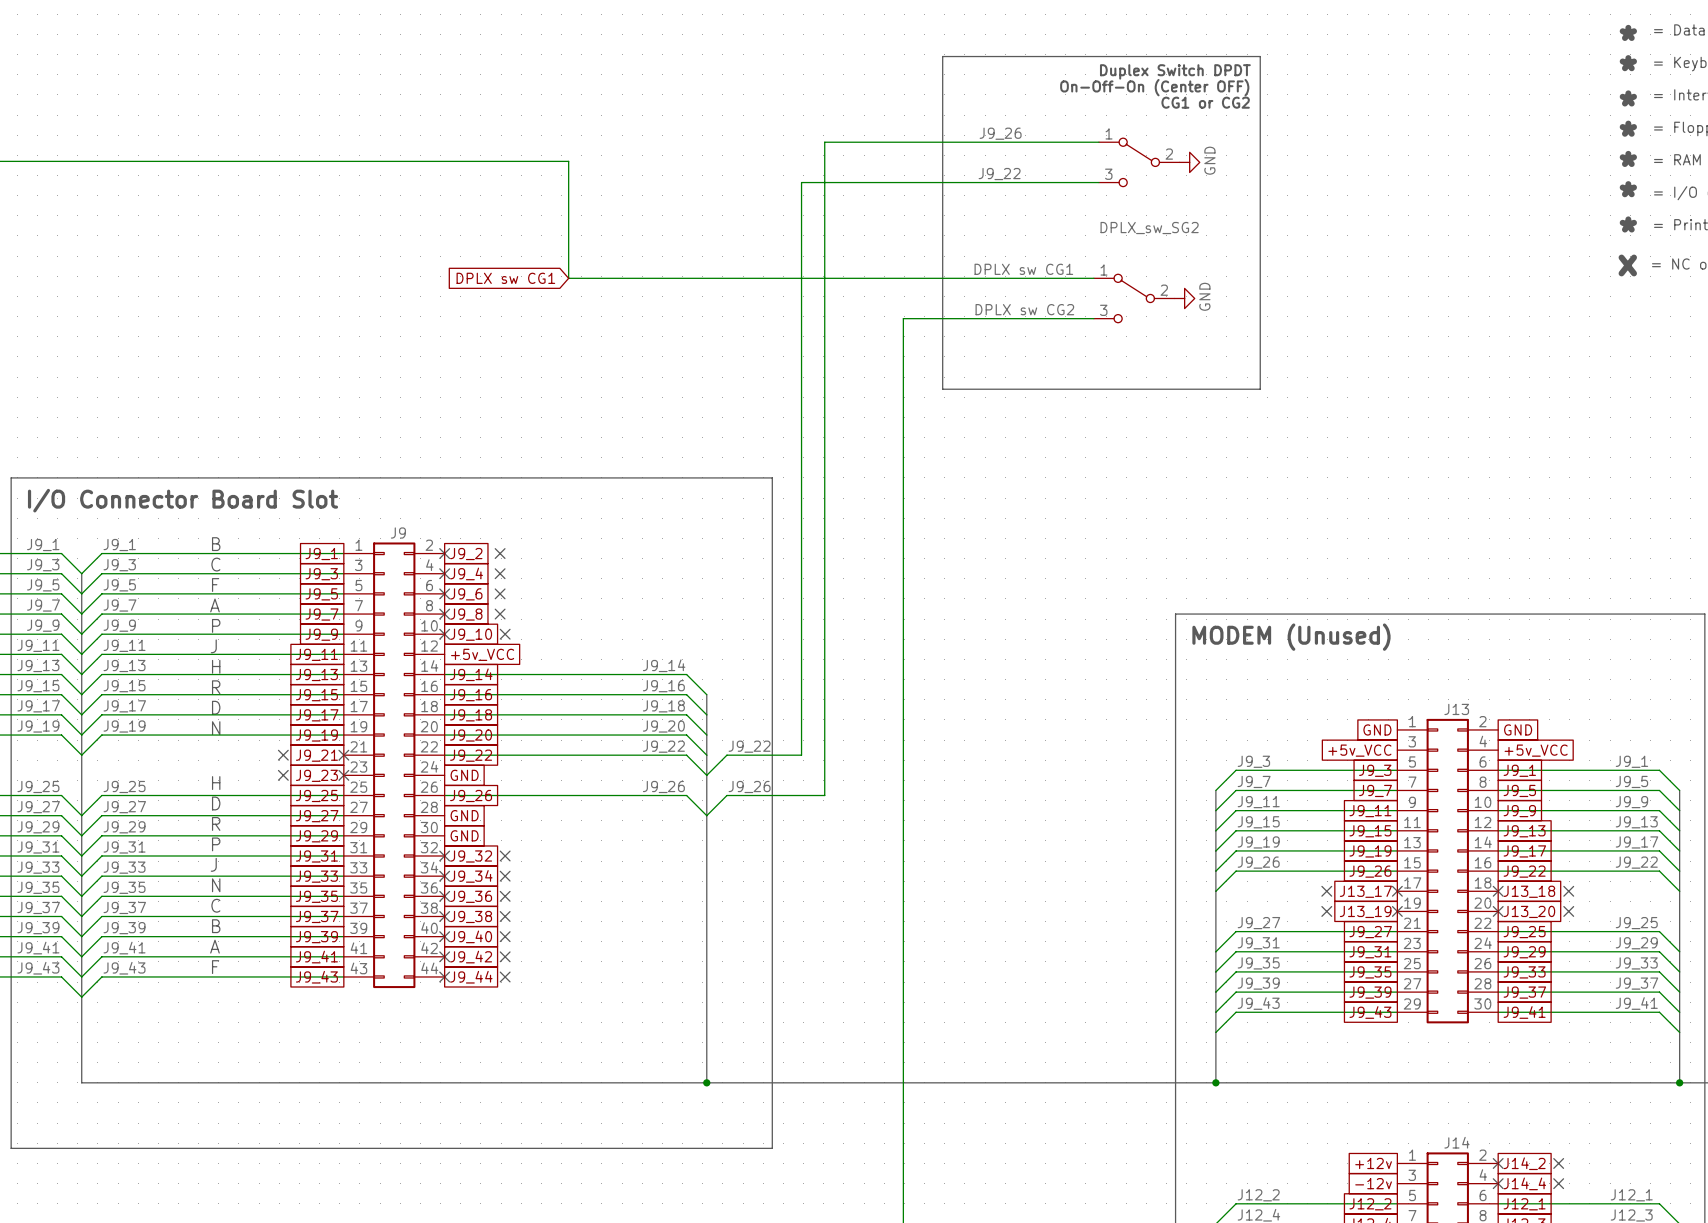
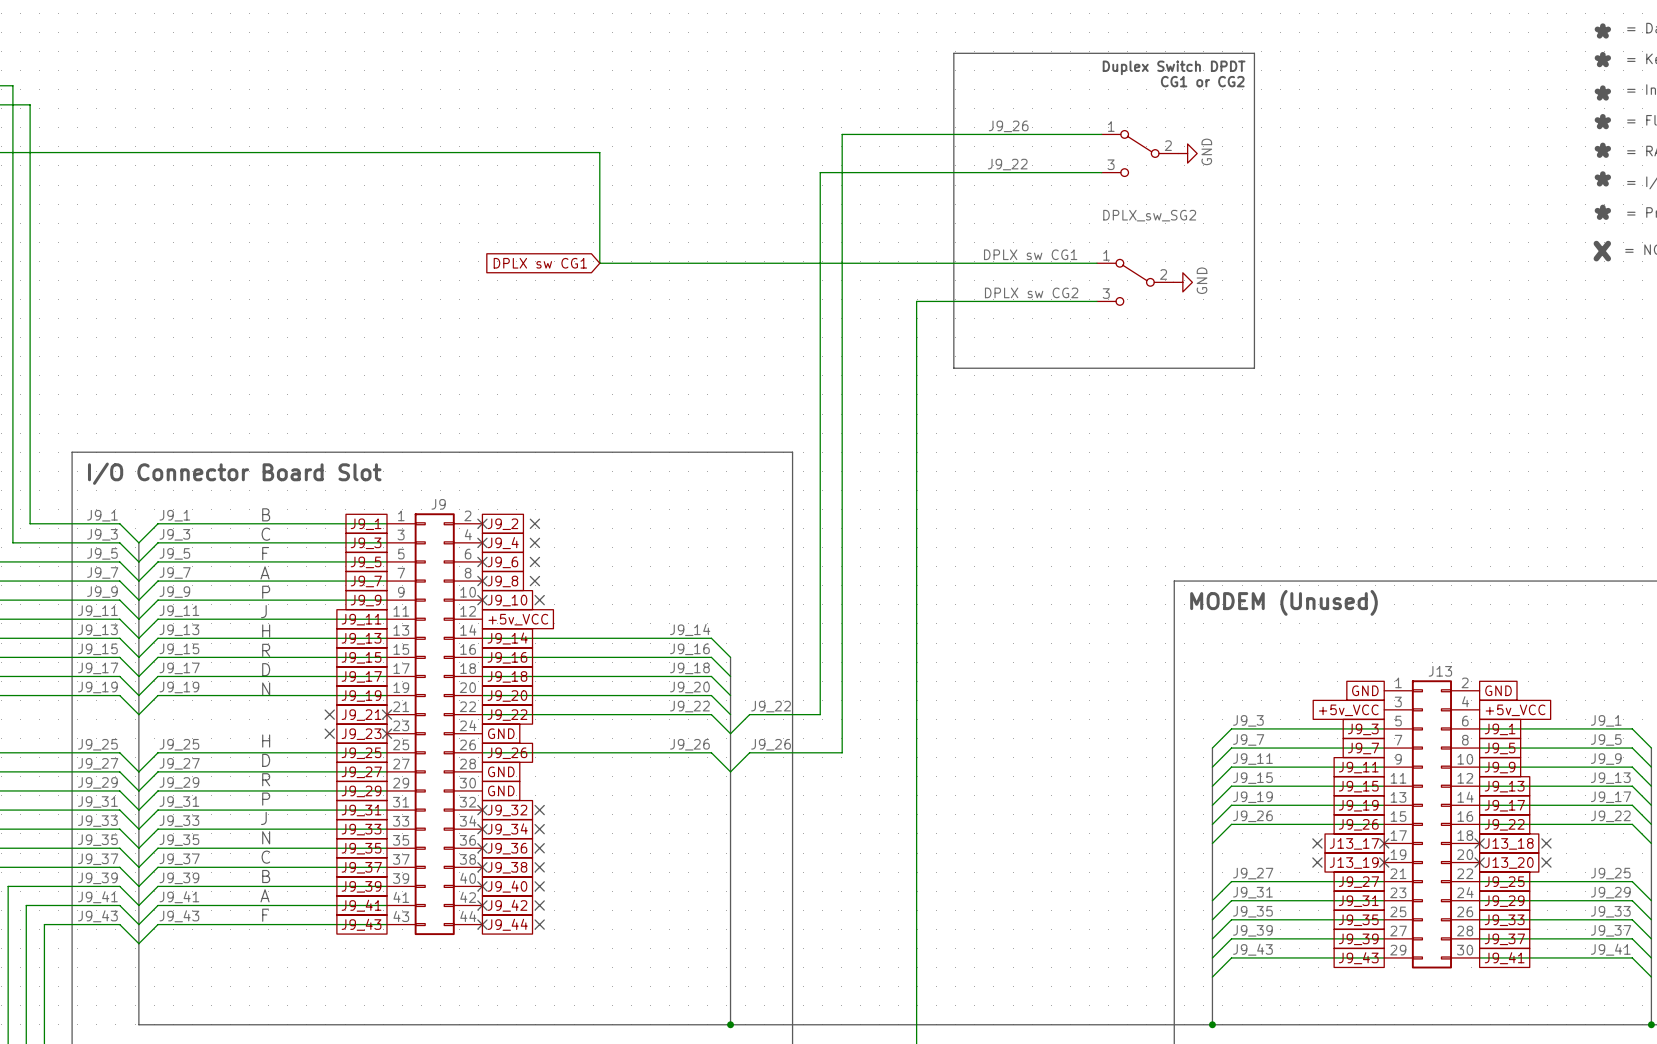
text: On-Off-On (Center OFF) (1154, 87) -> CG1 or CG2 (1202, 81)
text: CG1 or CG2 (1205, 102) -> none

